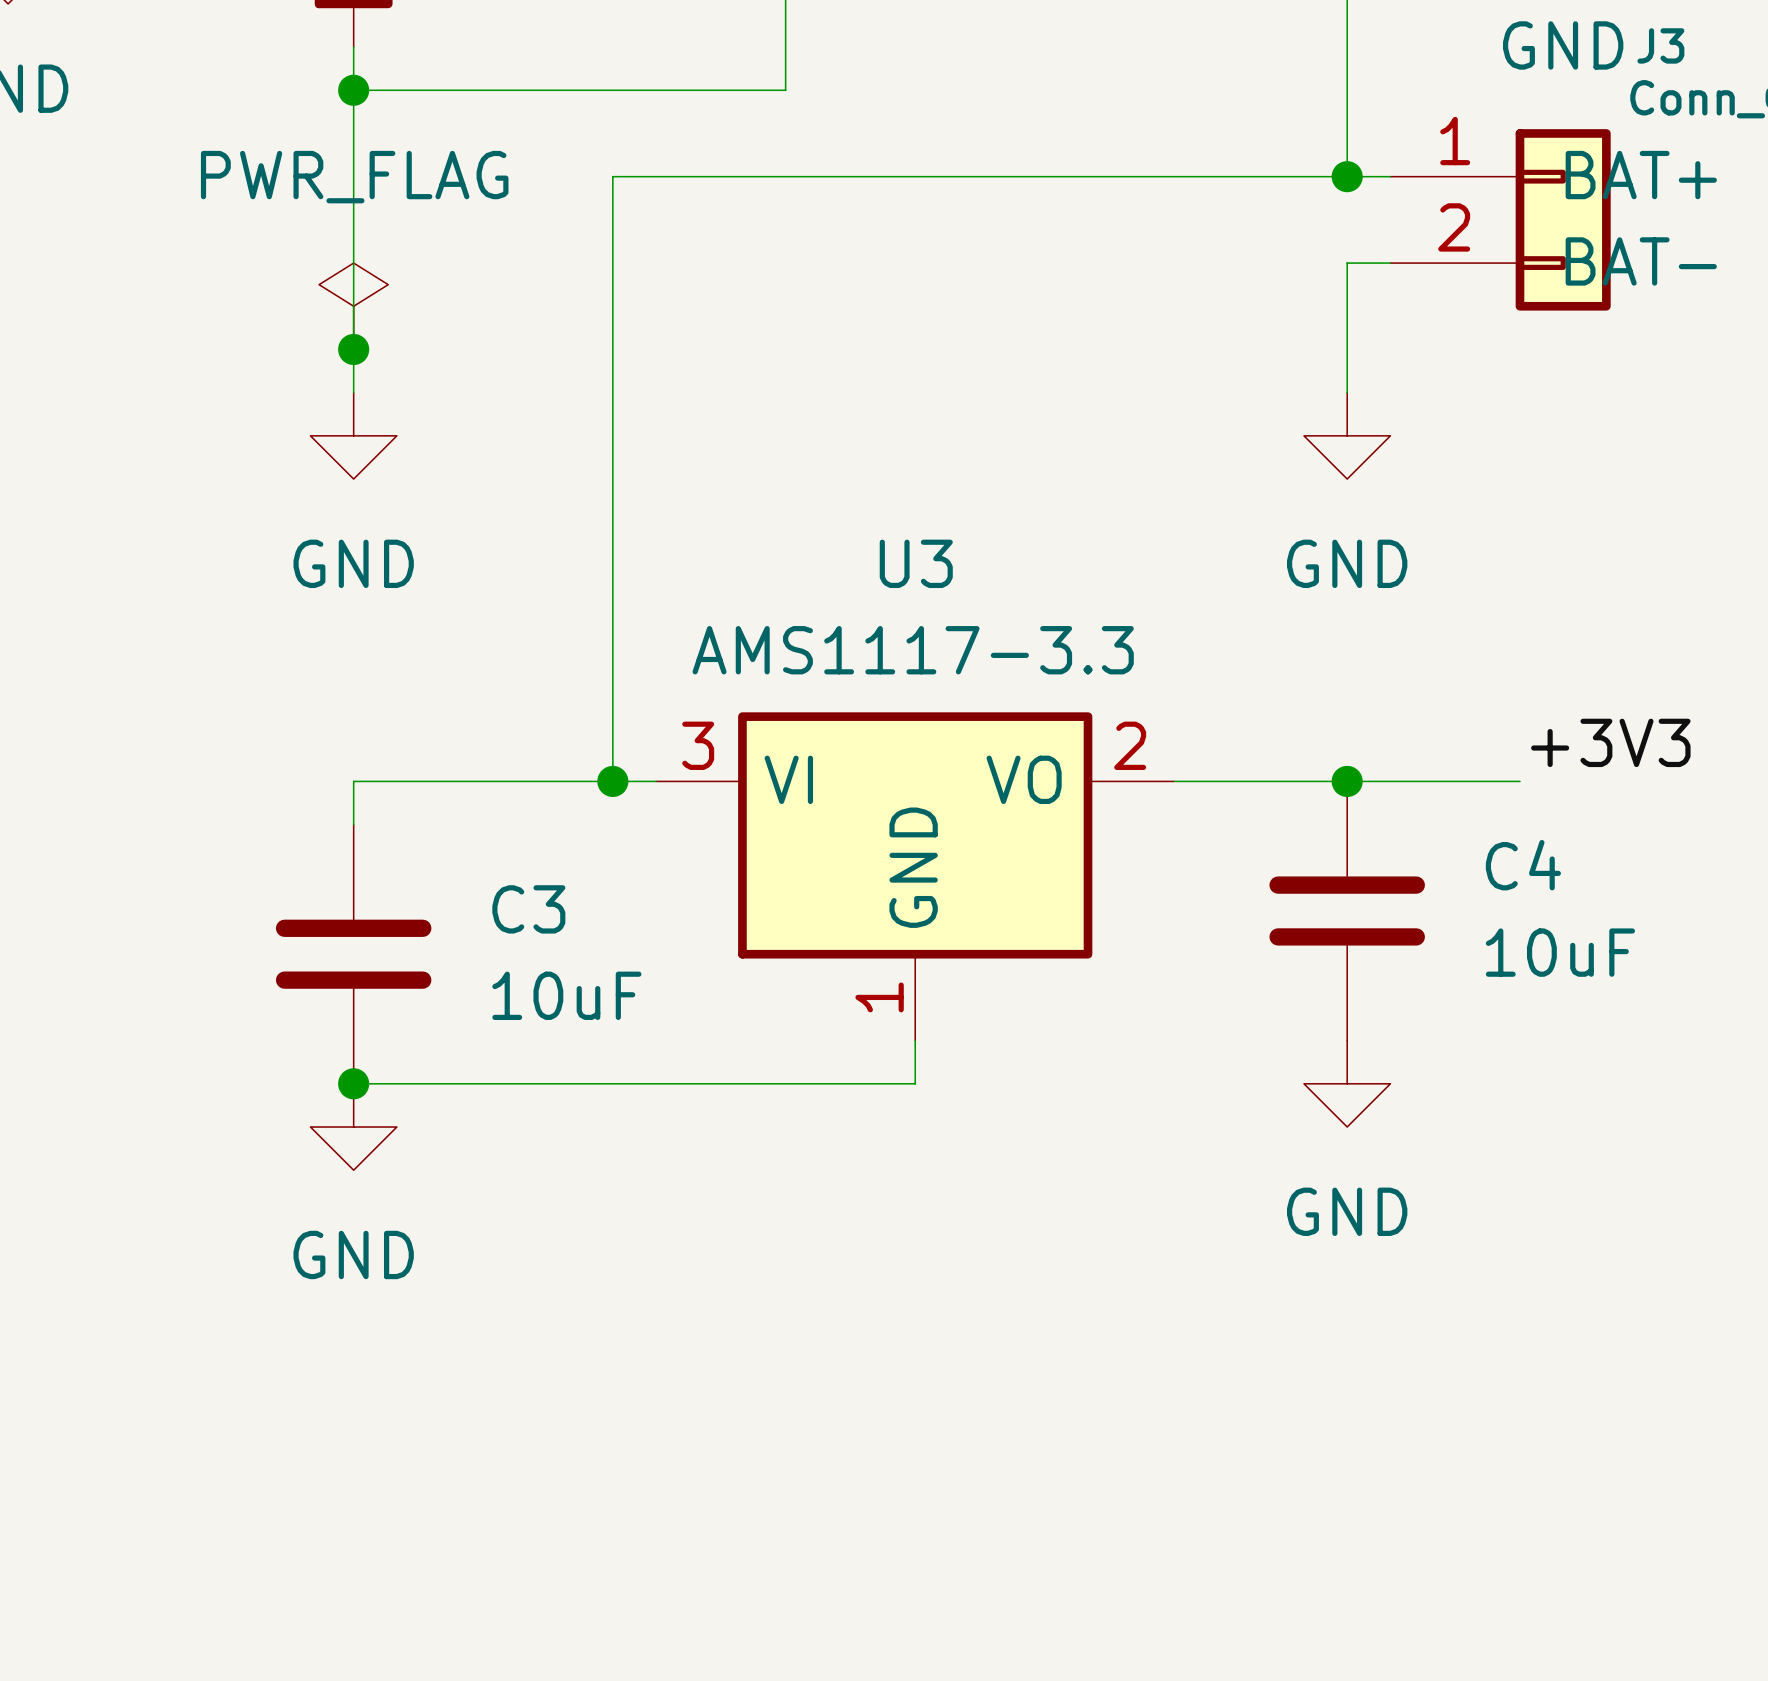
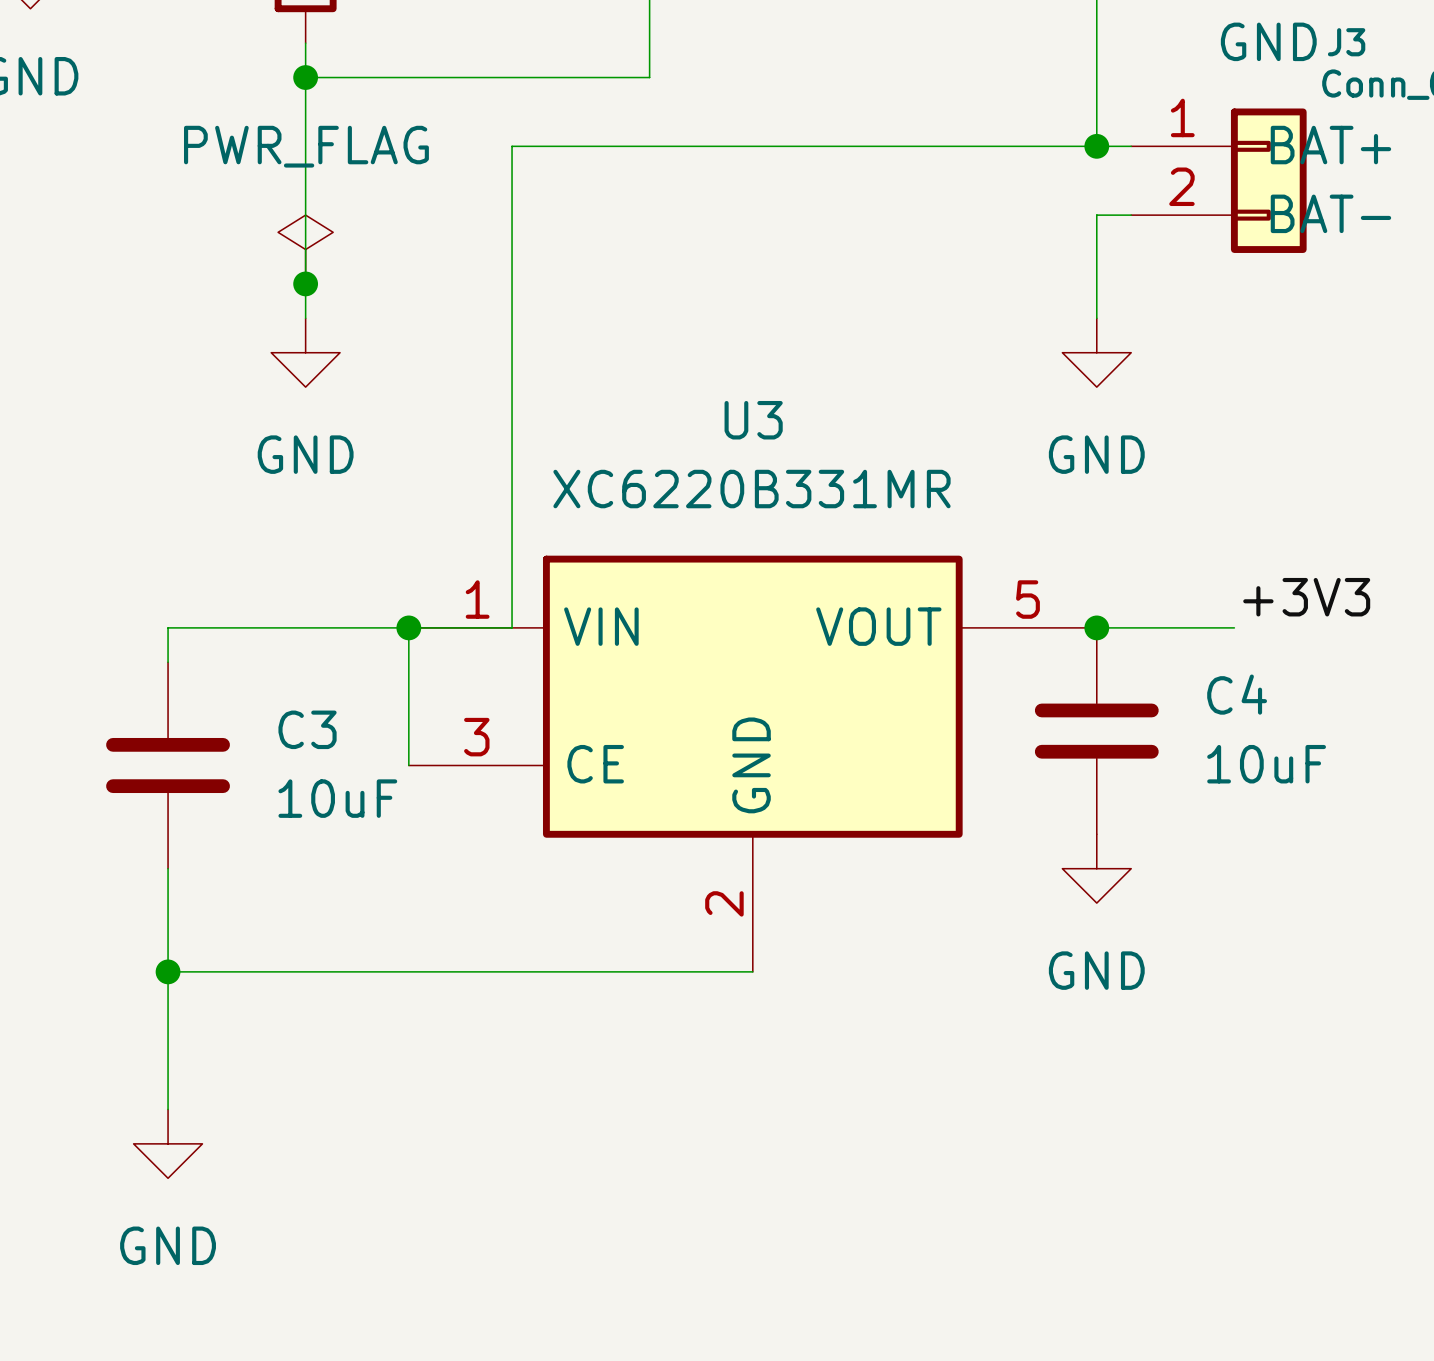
U3 name position: U3 (916, 563) -> U3 (753, 420)
U3 value: AMS1117-3.3 (913, 650) -> XC6220B331MR (751, 489)
U3 symbol: [656, 712, 1175, 1041] -> [408, 555, 1097, 972]
wire: (353, 781) (353, 824) -> (305, 627) (168, 627) (168, 662)
wire: none -> (408, 627) (408, 765)
junction position: (612, 781) -> (408, 627)
C3 position: (353, 954) -> (168, 765)
wire: (915, 1040) (915, 1083) (353, 1083) -> none
wire: none -> (168, 868) (168, 1109)
junction: (353, 1083) -> none
power symbol position: GND (353, 1127) -> GND (168, 1143)
wire: none -> (168, 971) (752, 971)
junction: none -> (168, 971)

